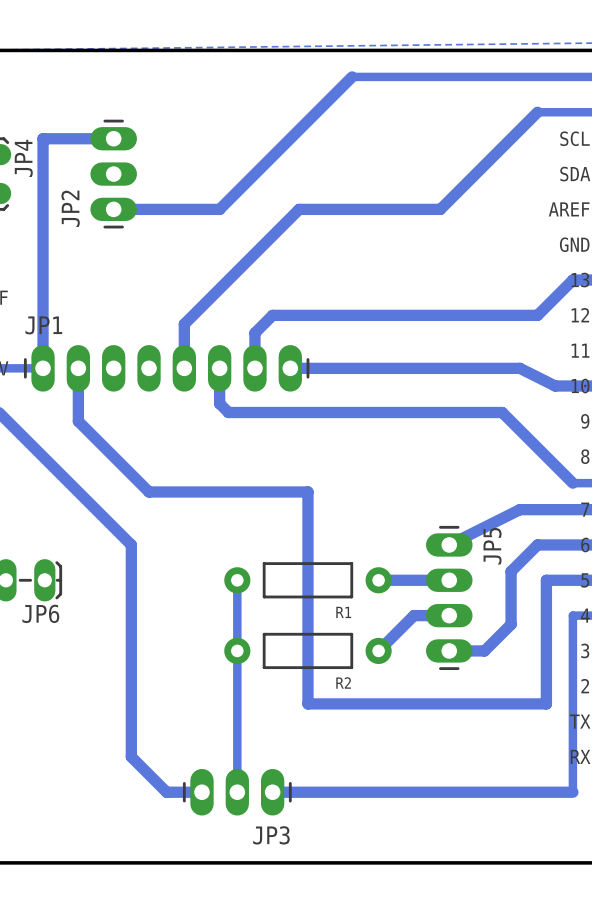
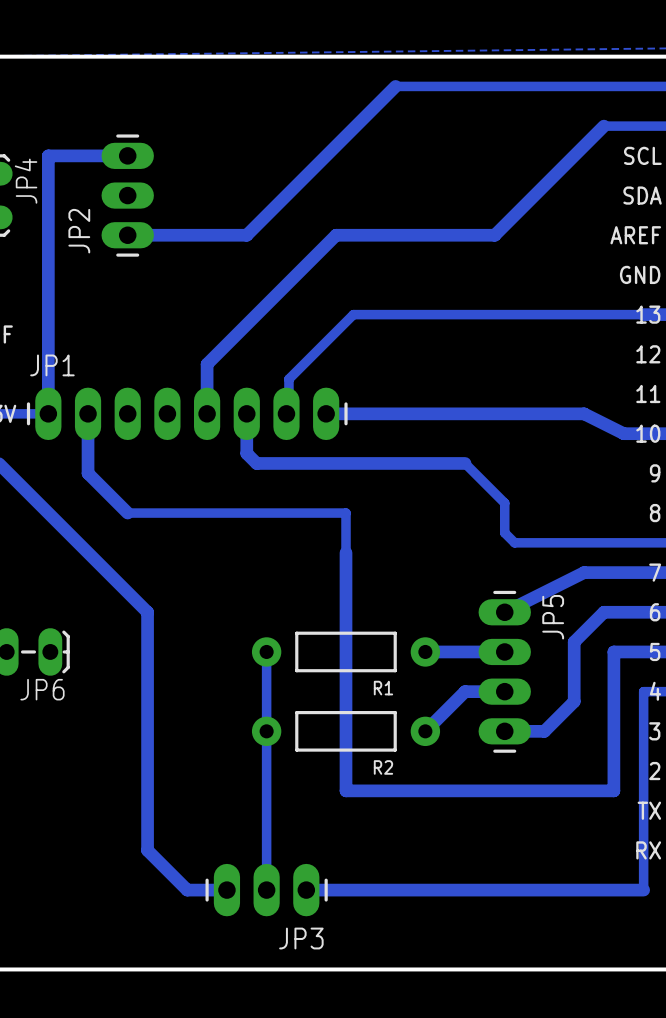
bottom track: (572, 280) (537, 315) (272, 315) (254, 333) (254, 368) -> (643, 314) (353, 314) (288, 379) (288, 406) (286, 413)
bottom track: (413, 412) (502, 412) (572, 483) -> (465, 463) (504, 503) (504, 532) (514, 542) (643, 542)
bottom track: (113, 456) (149, 491) (307, 491) -> (127, 513) (346, 513) (346, 552)

